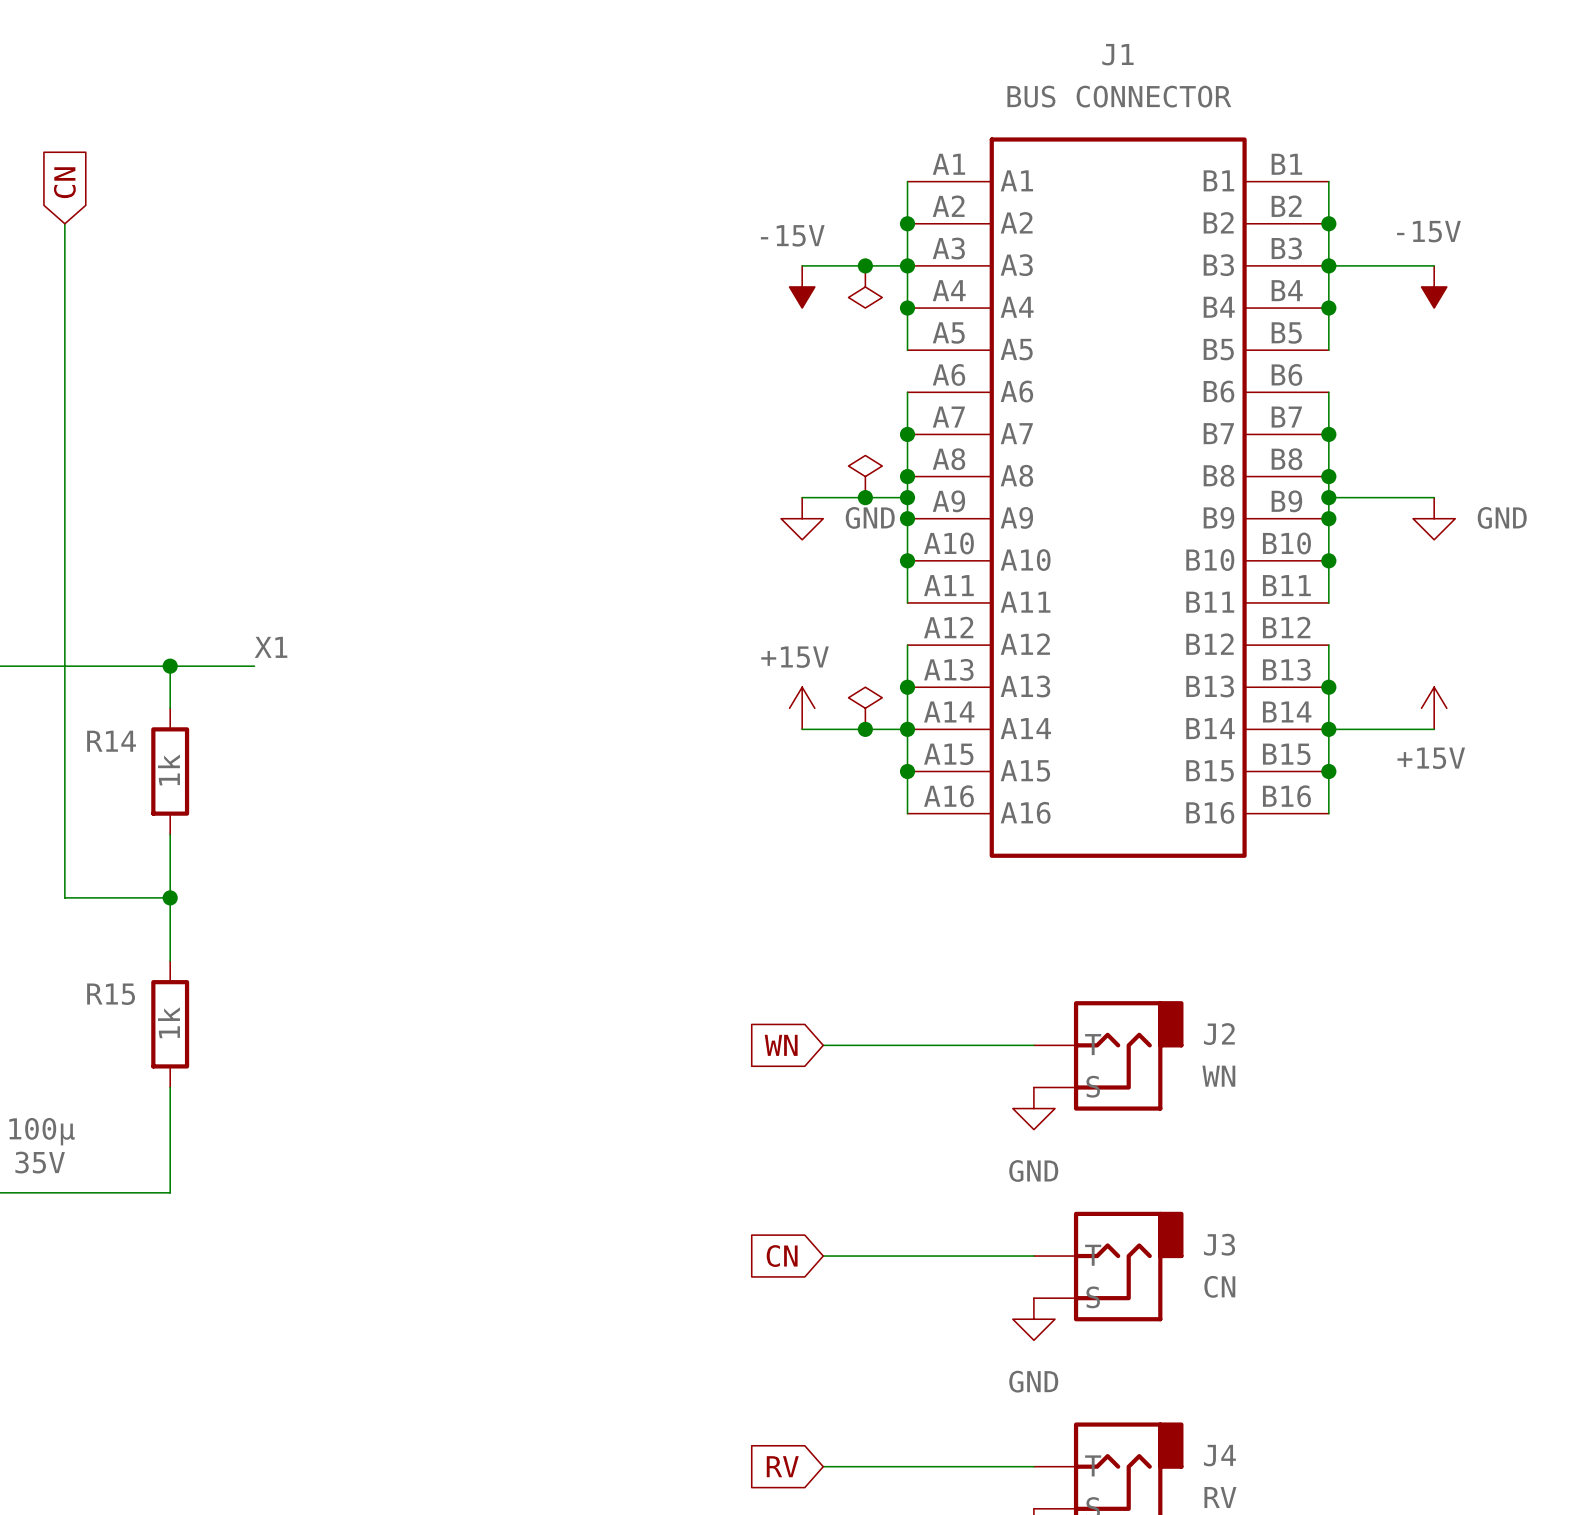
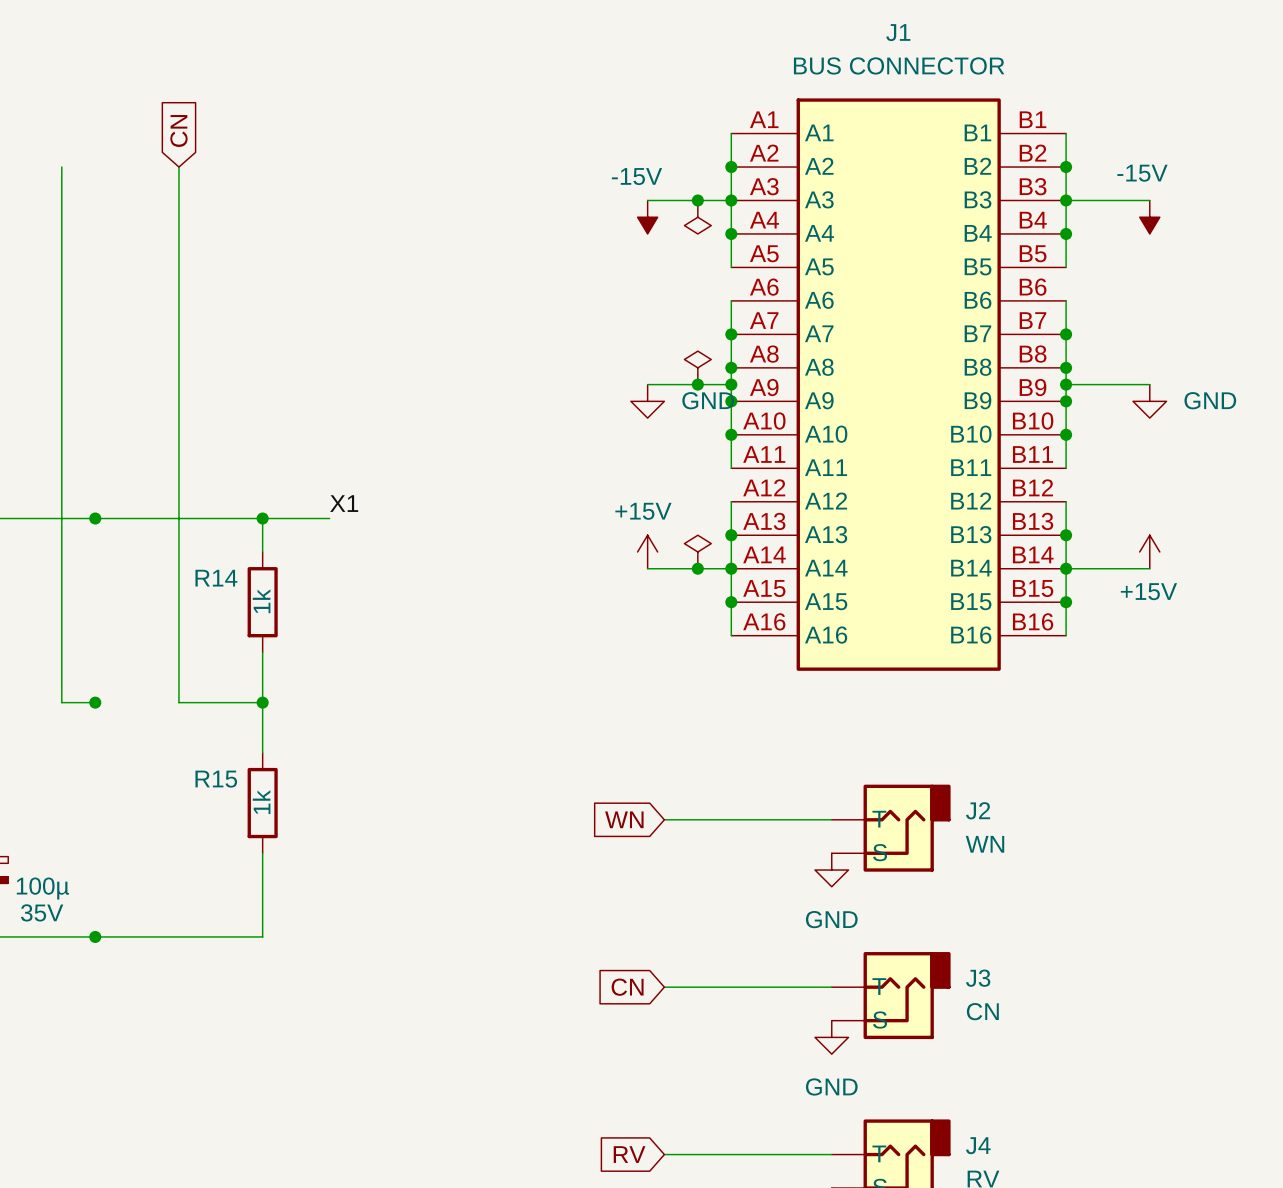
global label position: CN (64, 182) -> CN (178, 130)
wire: none -> (178, 167) (178, 702) (262, 702)
label position: X1 (271, 647) -> X1 (344, 503)
wire: (170, 666) (170, 708) -> (262, 518) (262, 551)
junction position: (170, 666) -> (95, 518)
wire: none -> (212, 518) (329, 518)
junction: none -> (262, 518)
R14 position: (170, 771) -> (262, 602)
wire: (170, 834) (170, 961) -> (262, 652) (262, 752)
wire: (106, 897) (170, 897) -> none
junction position: (170, 897) -> (95, 702)
junction: none -> (262, 702)
R15 position: (170, 1024) -> (262, 803)
wire: (170, 1087) (170, 1192) -> (262, 853) (262, 936) (145, 936)
junction: none -> (95, 936)

